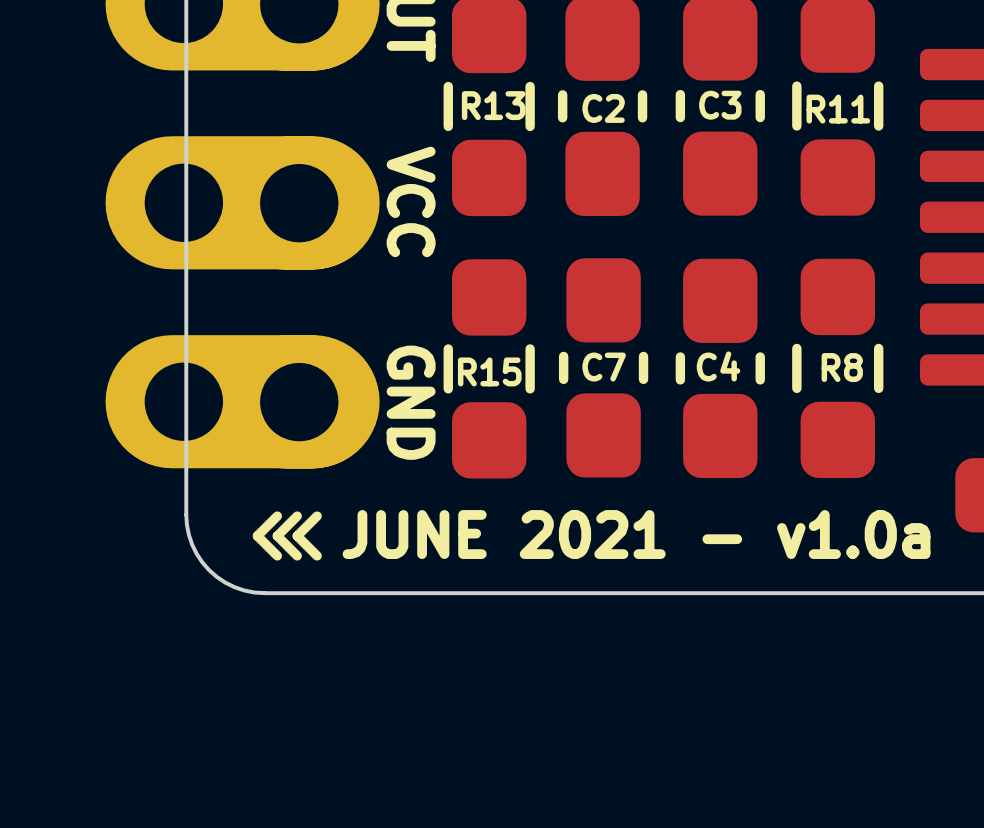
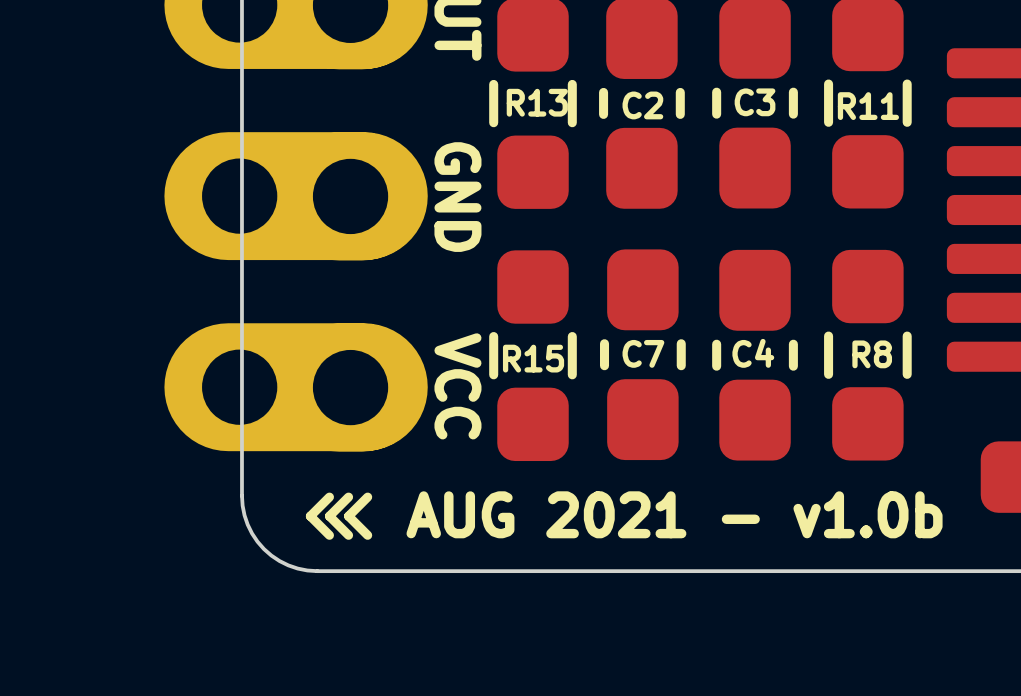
text: VCC (411, 201) -> GND (457, 197)
text: GND (411, 402) -> VCC (457, 386)
text: JUNE 2021 - v1.0a (636, 534) -> AUG 2021 - v1.0b (674, 514)

